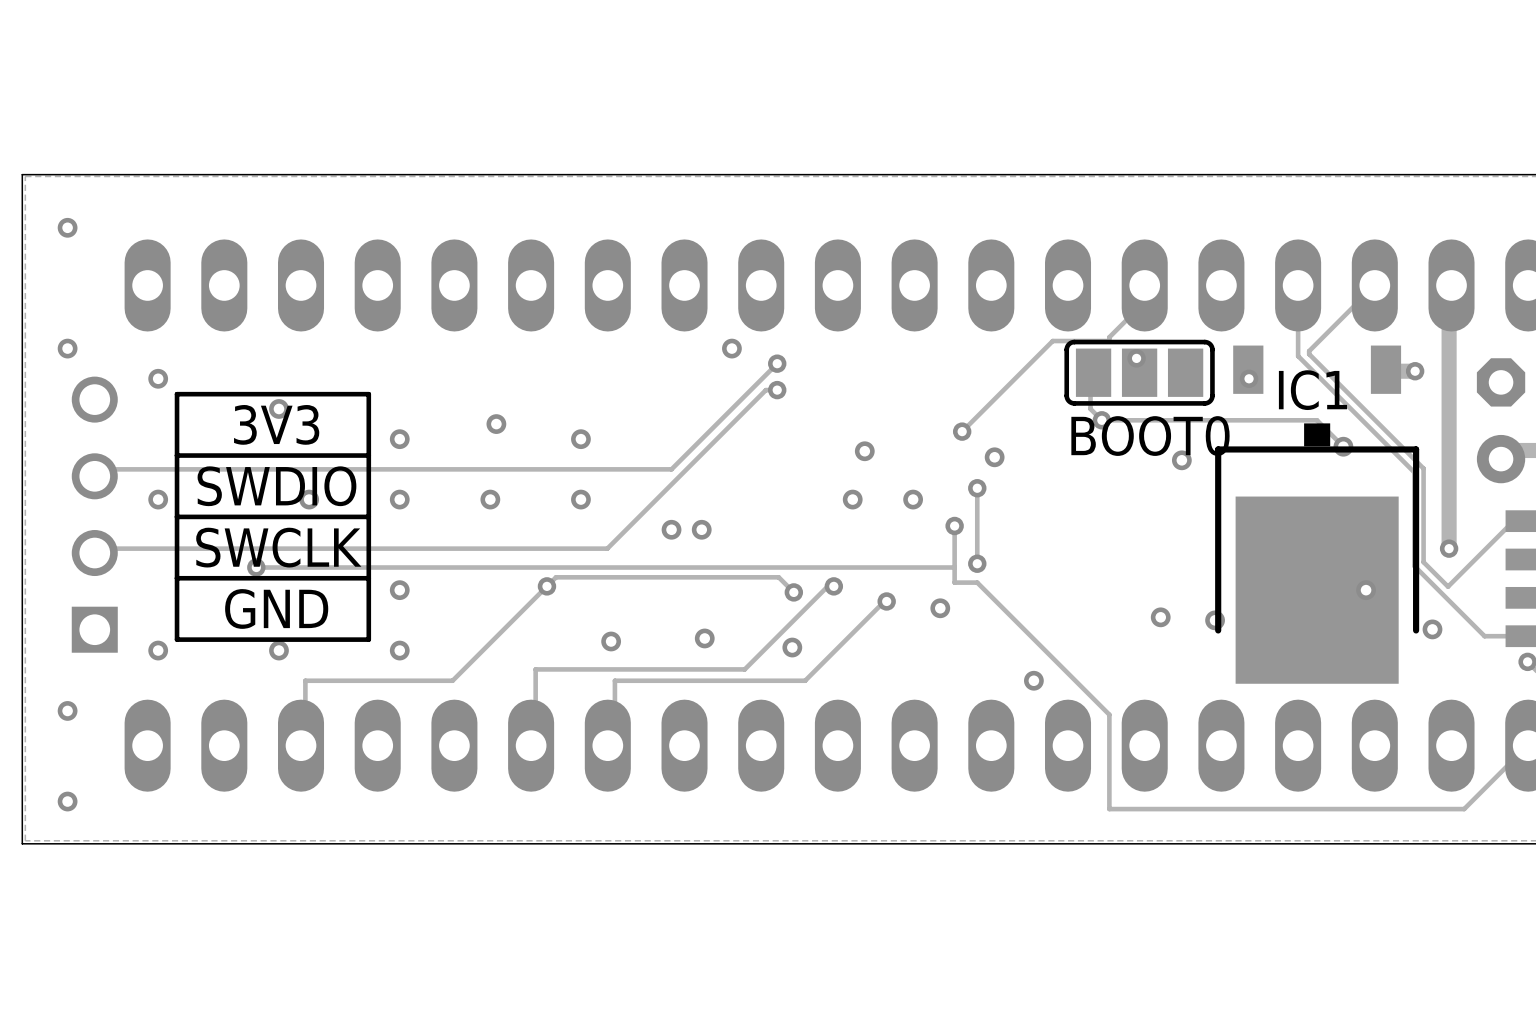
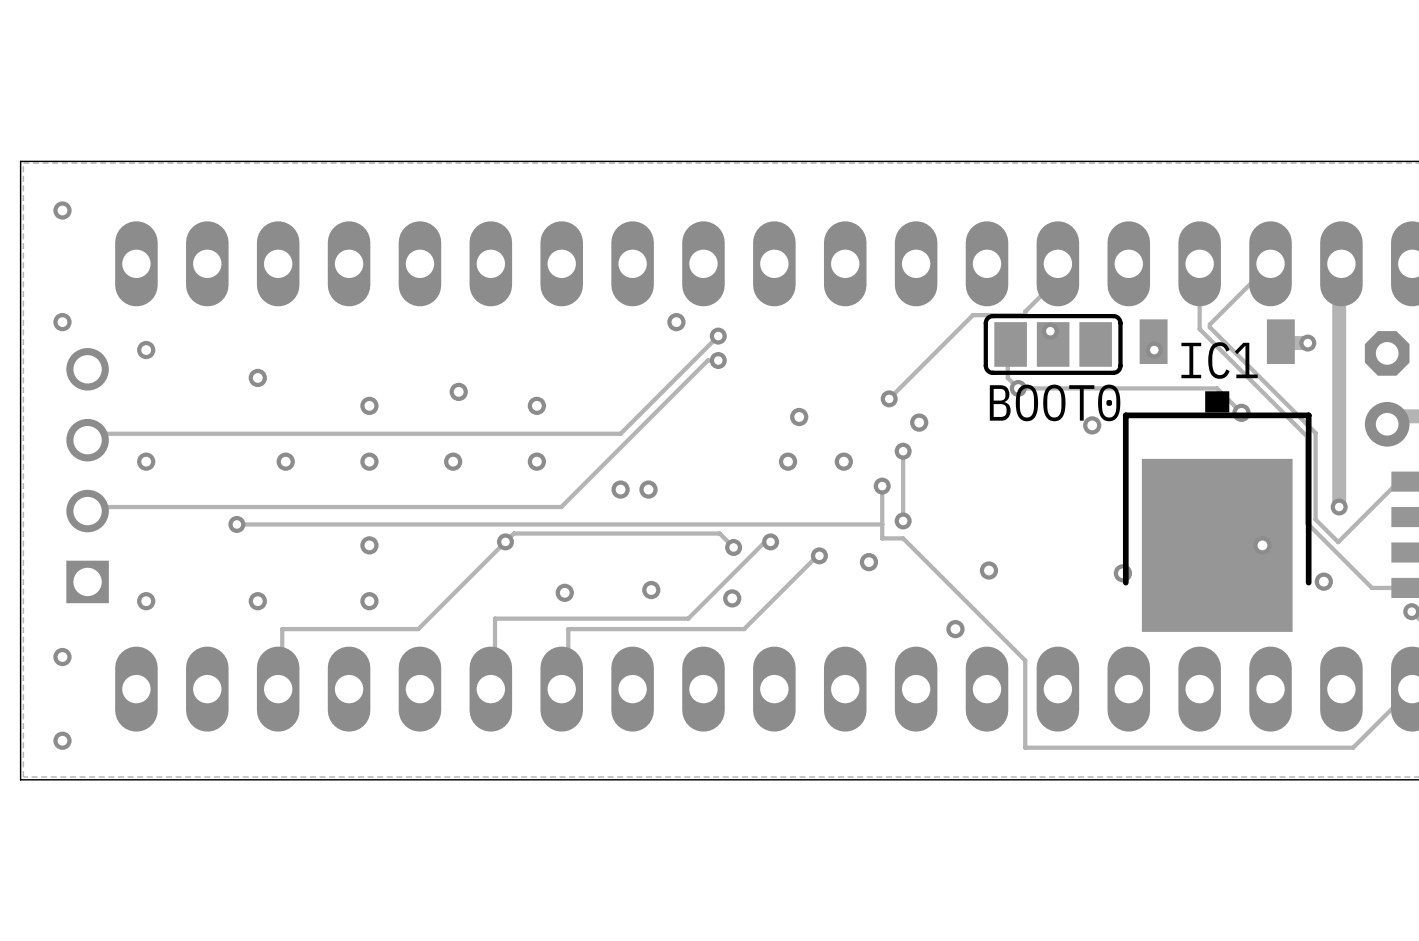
line: (368, 394) (177, 394) (177, 639) (368, 639) (368, 394) -> none
text: 3V3 (276, 424) -> none
line: (368, 455) (177, 455) -> none
text: SWDIO (276, 486) -> none
line: (368, 516) (177, 516) -> none
text: SWCLK (278, 547) -> none
line: (368, 578) (177, 578) -> none
text: GND (276, 608) -> none
via position: (1160, 617) -> (988, 570)

